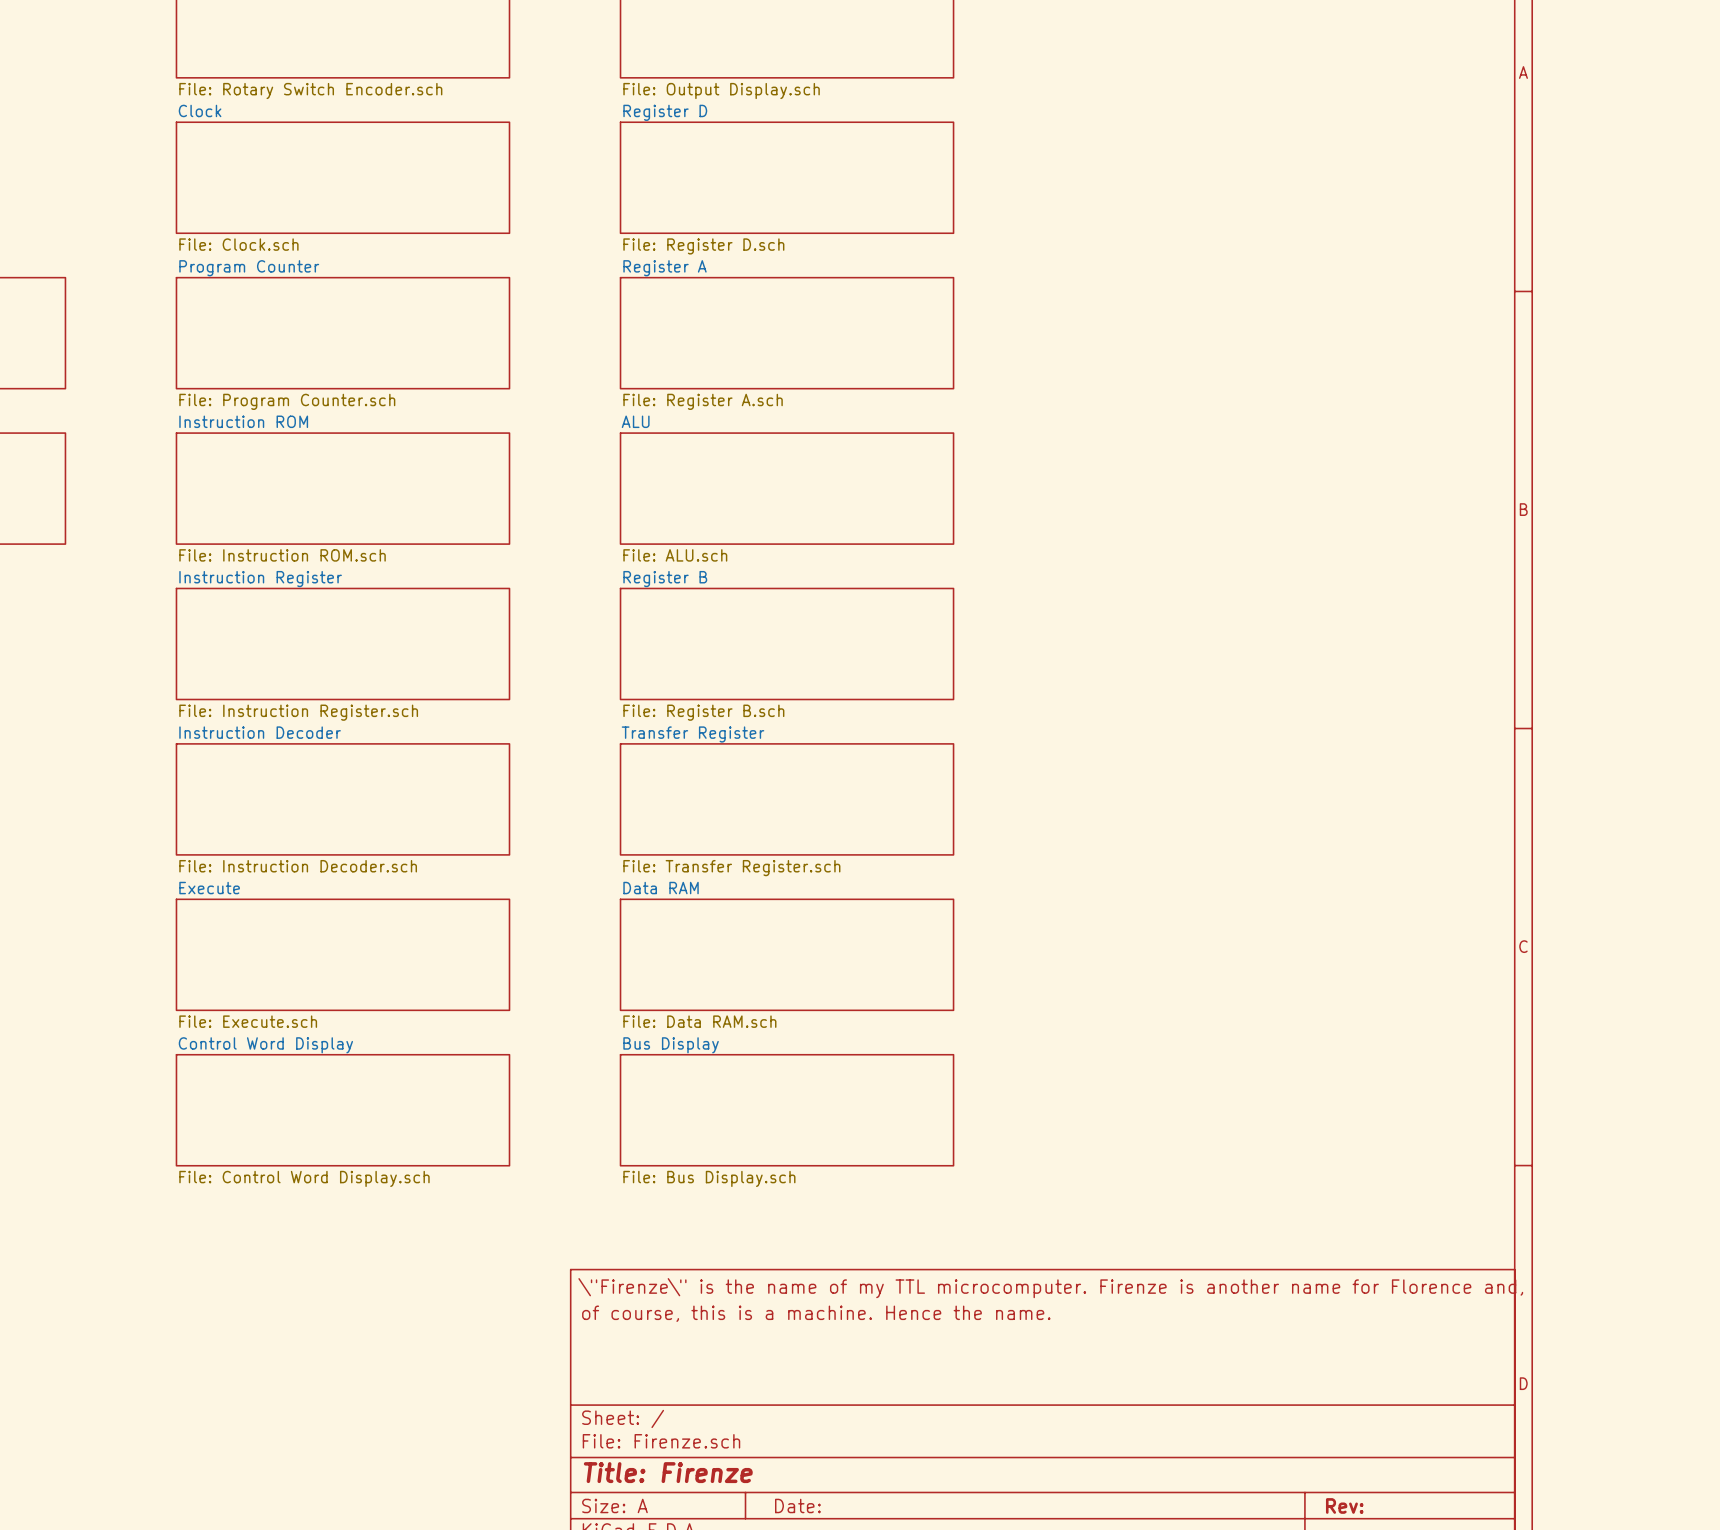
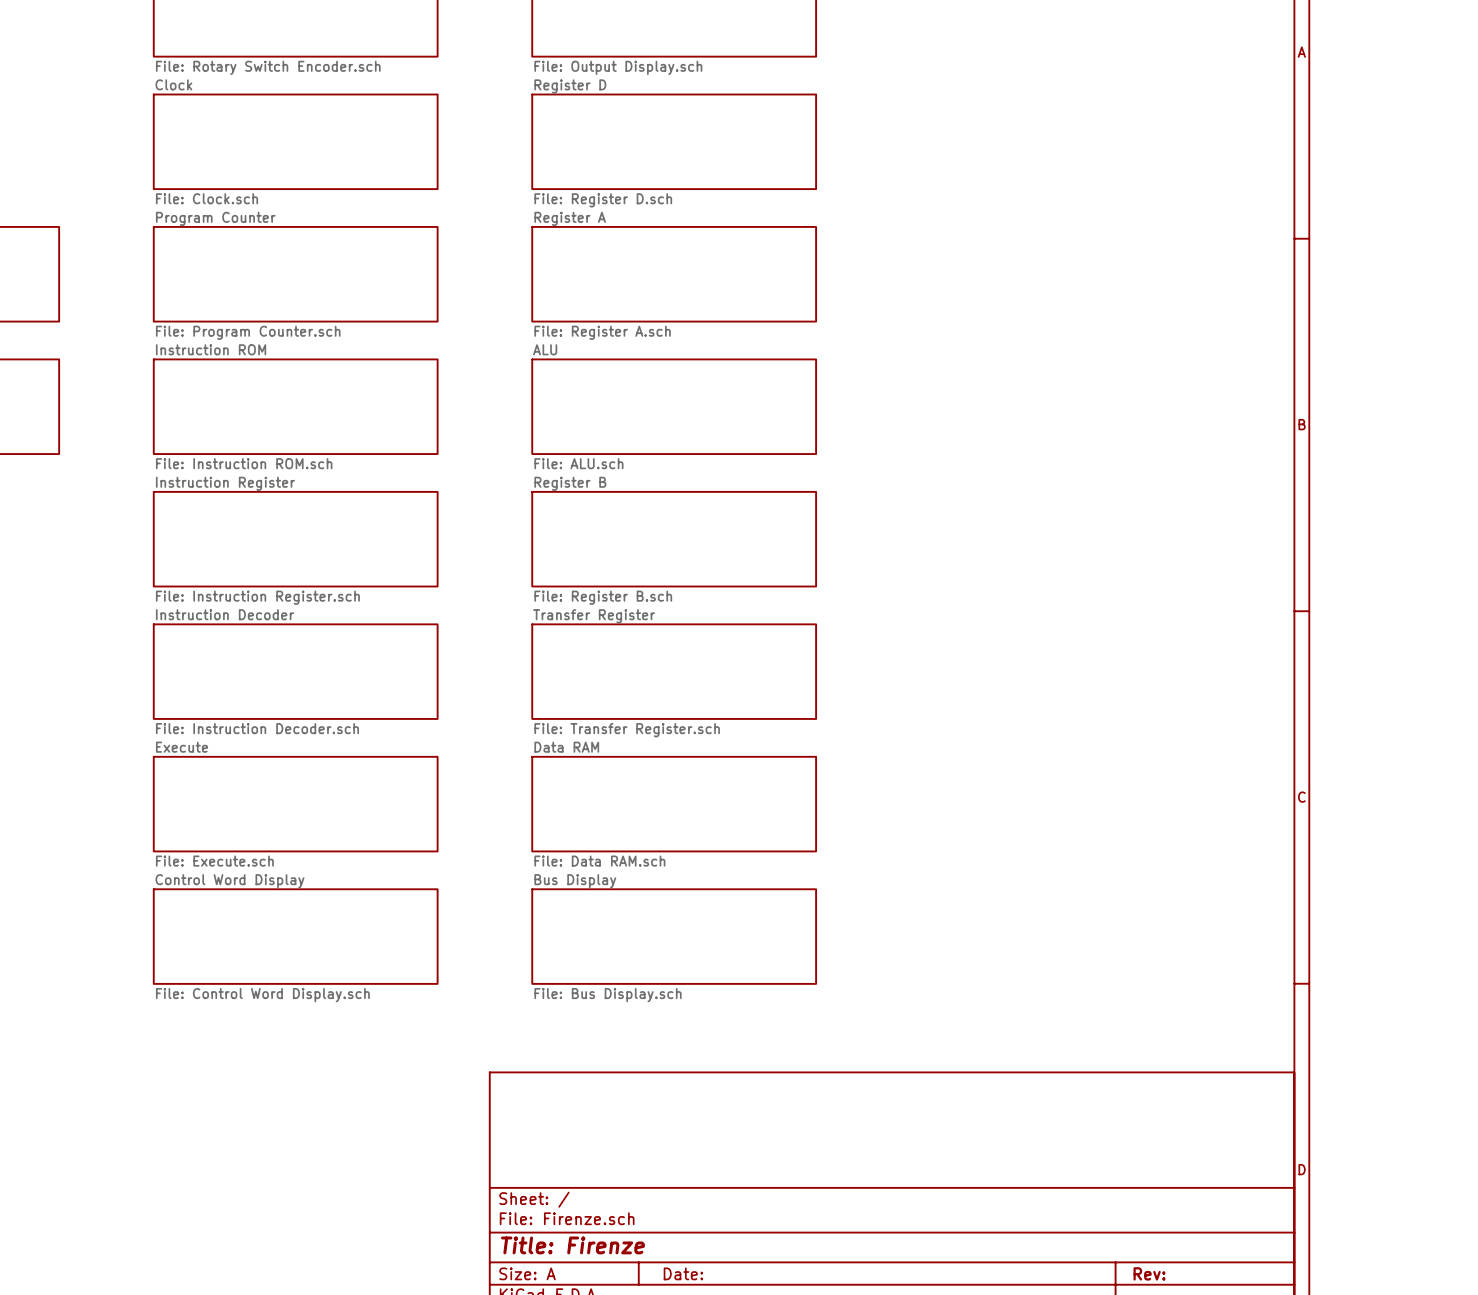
title block: \"Firenze\" is the name of my TTL microcomputer. Firenze is another name for Florence and, (1050, 1288) -> none
title block: of course, this is a machine. Hence the name. (816, 1313) -> none

